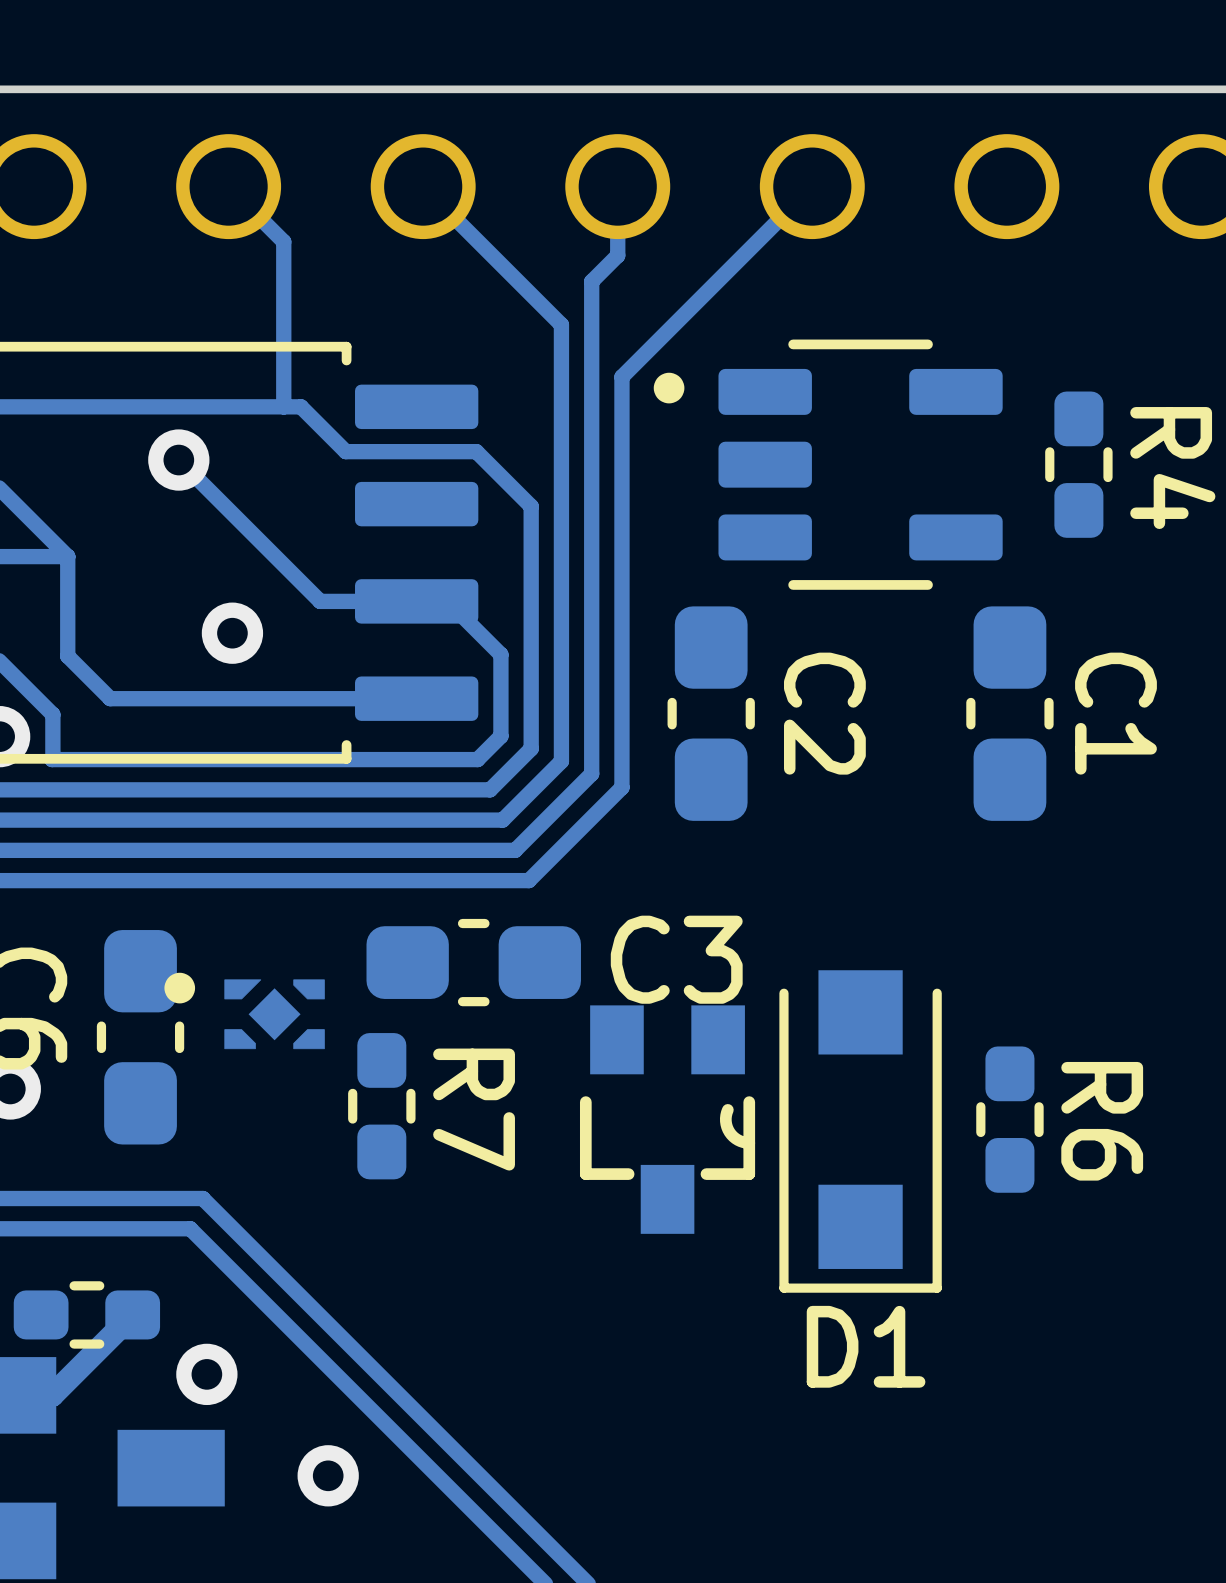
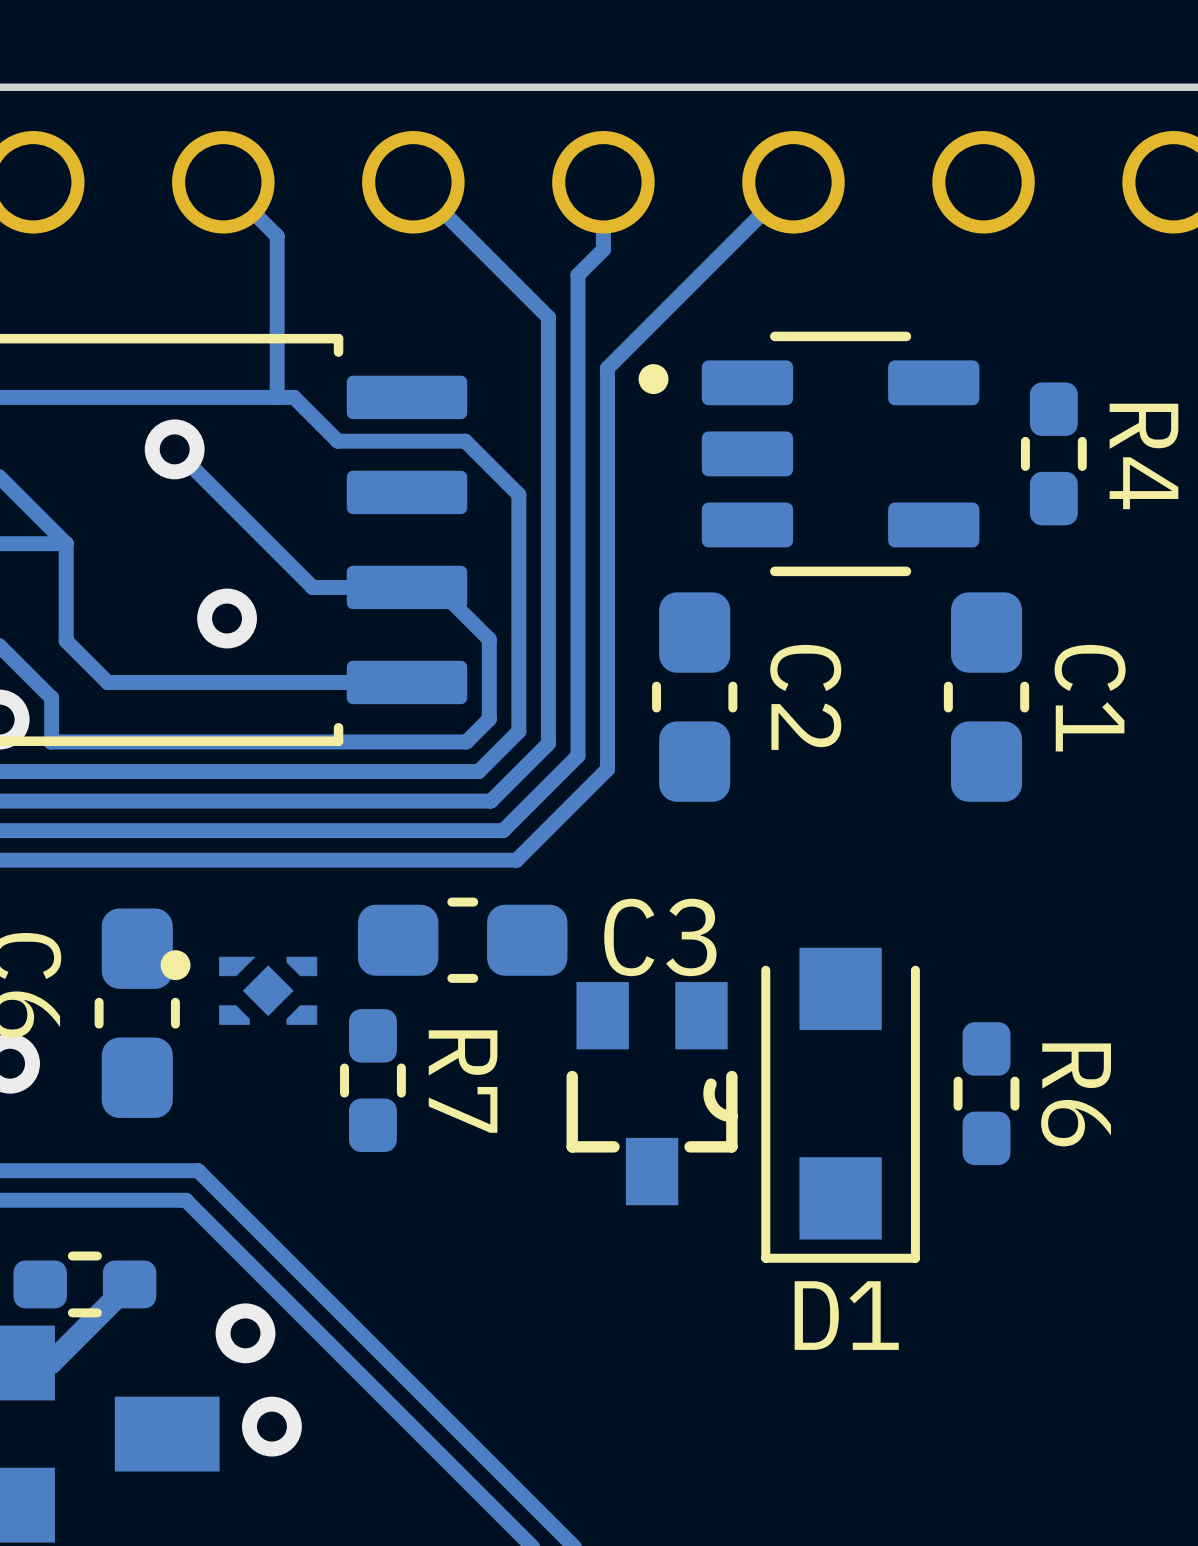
via position: (206, 1374) -> (245, 1333)
via position: (328, 1475) -> (271, 1426)

